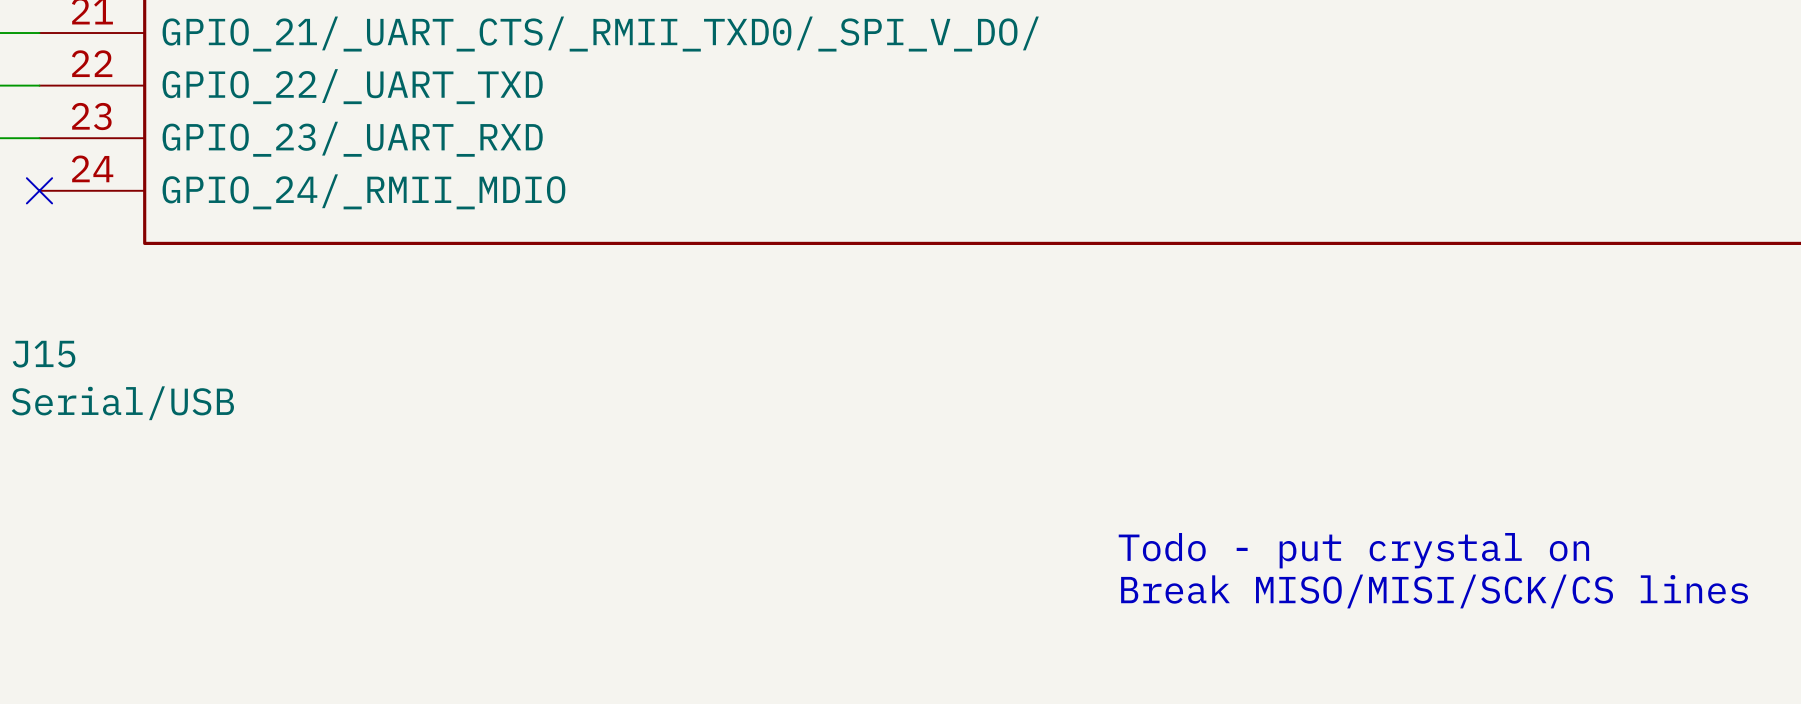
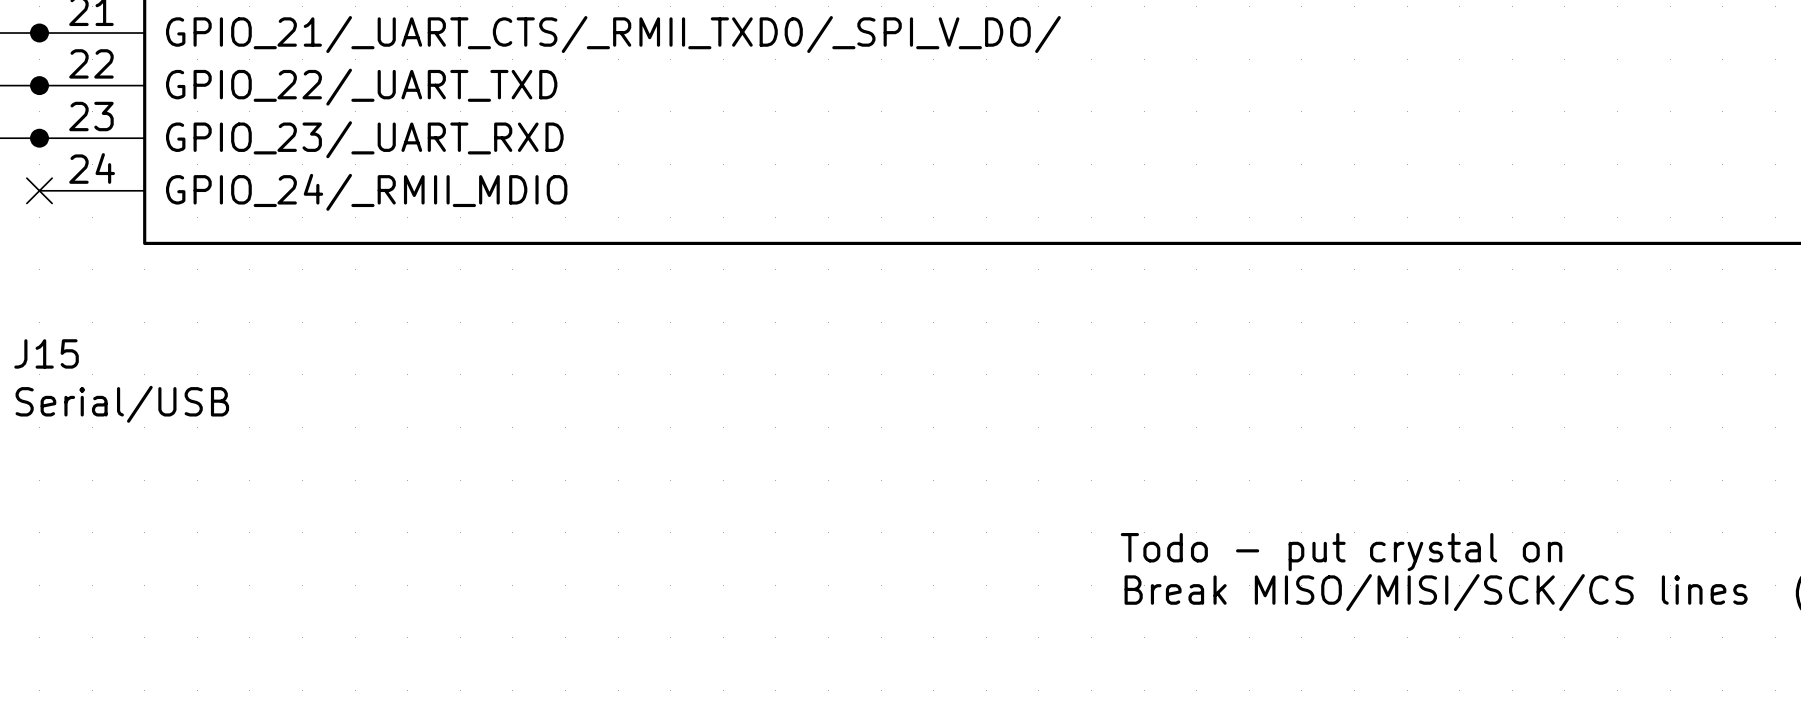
junction: none -> (39, 33)
junction: none -> (39, 85)
junction: none -> (39, 138)

